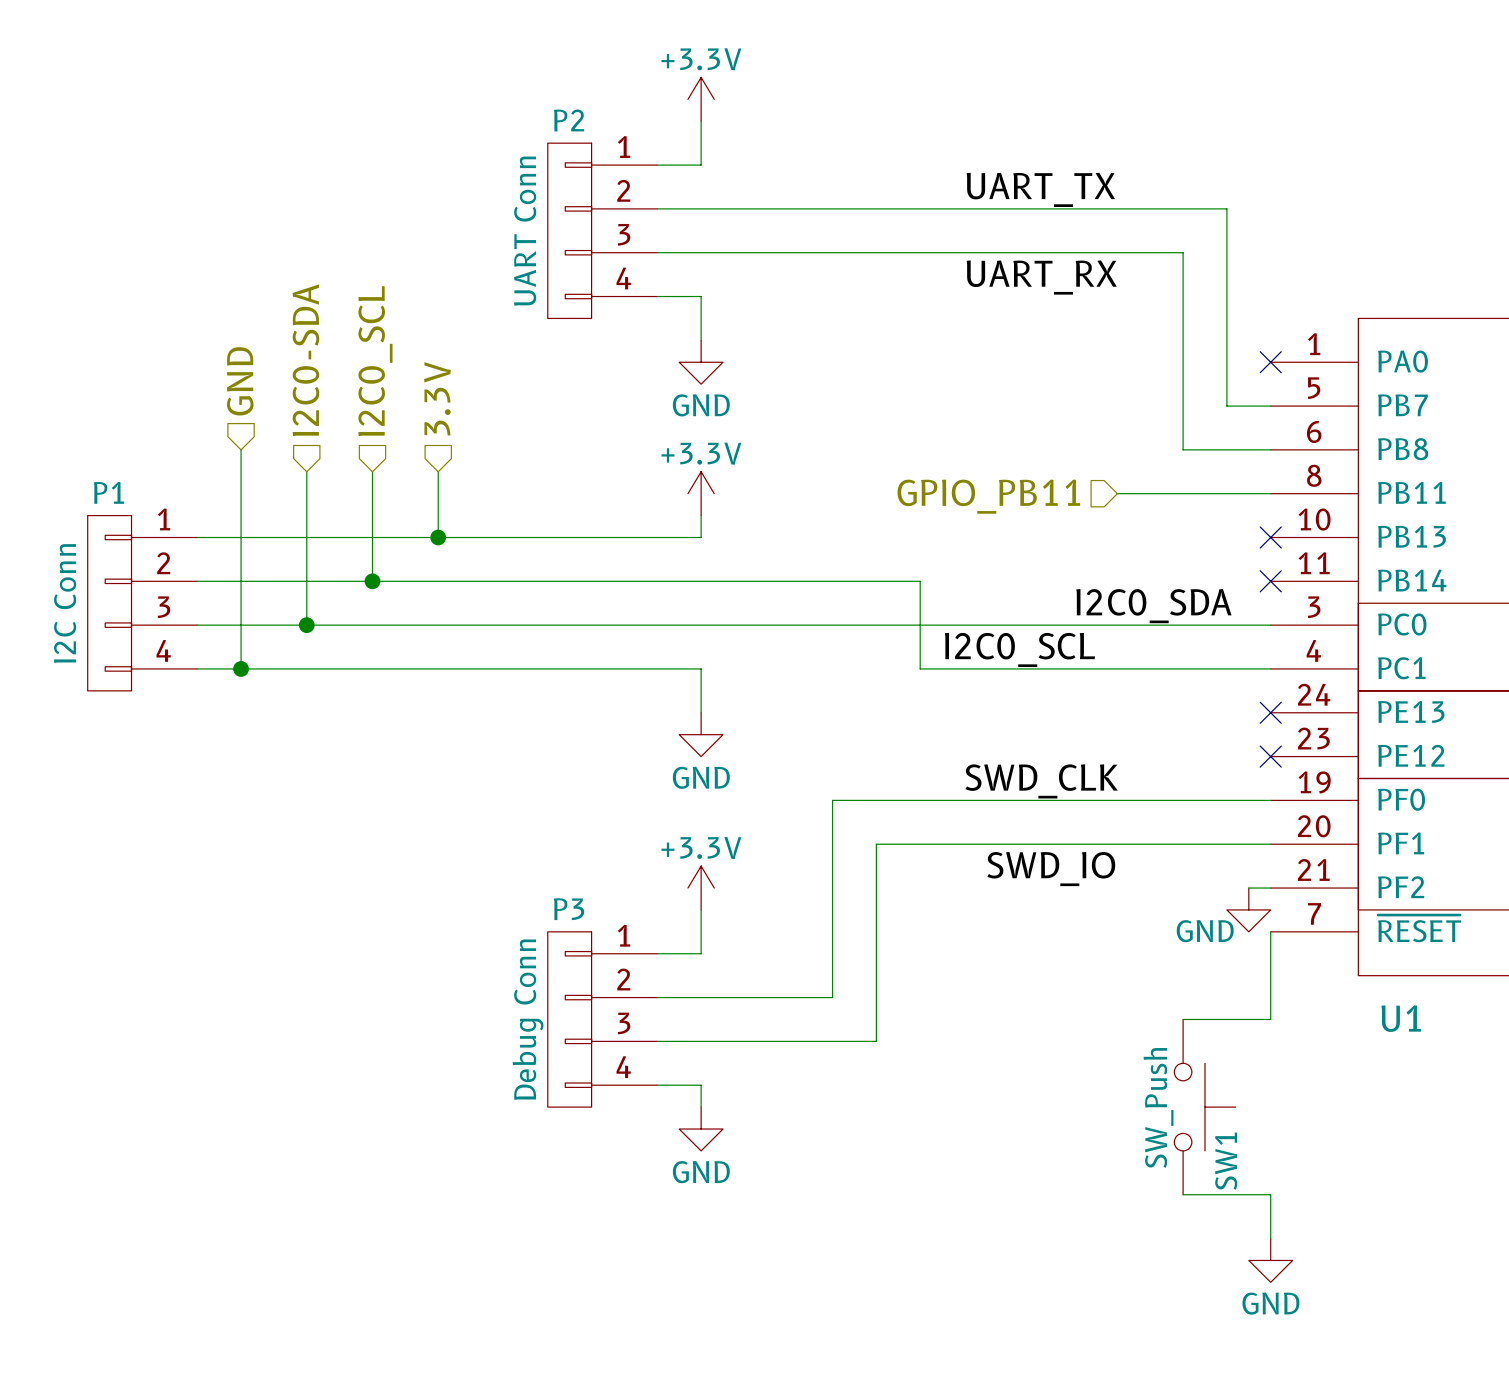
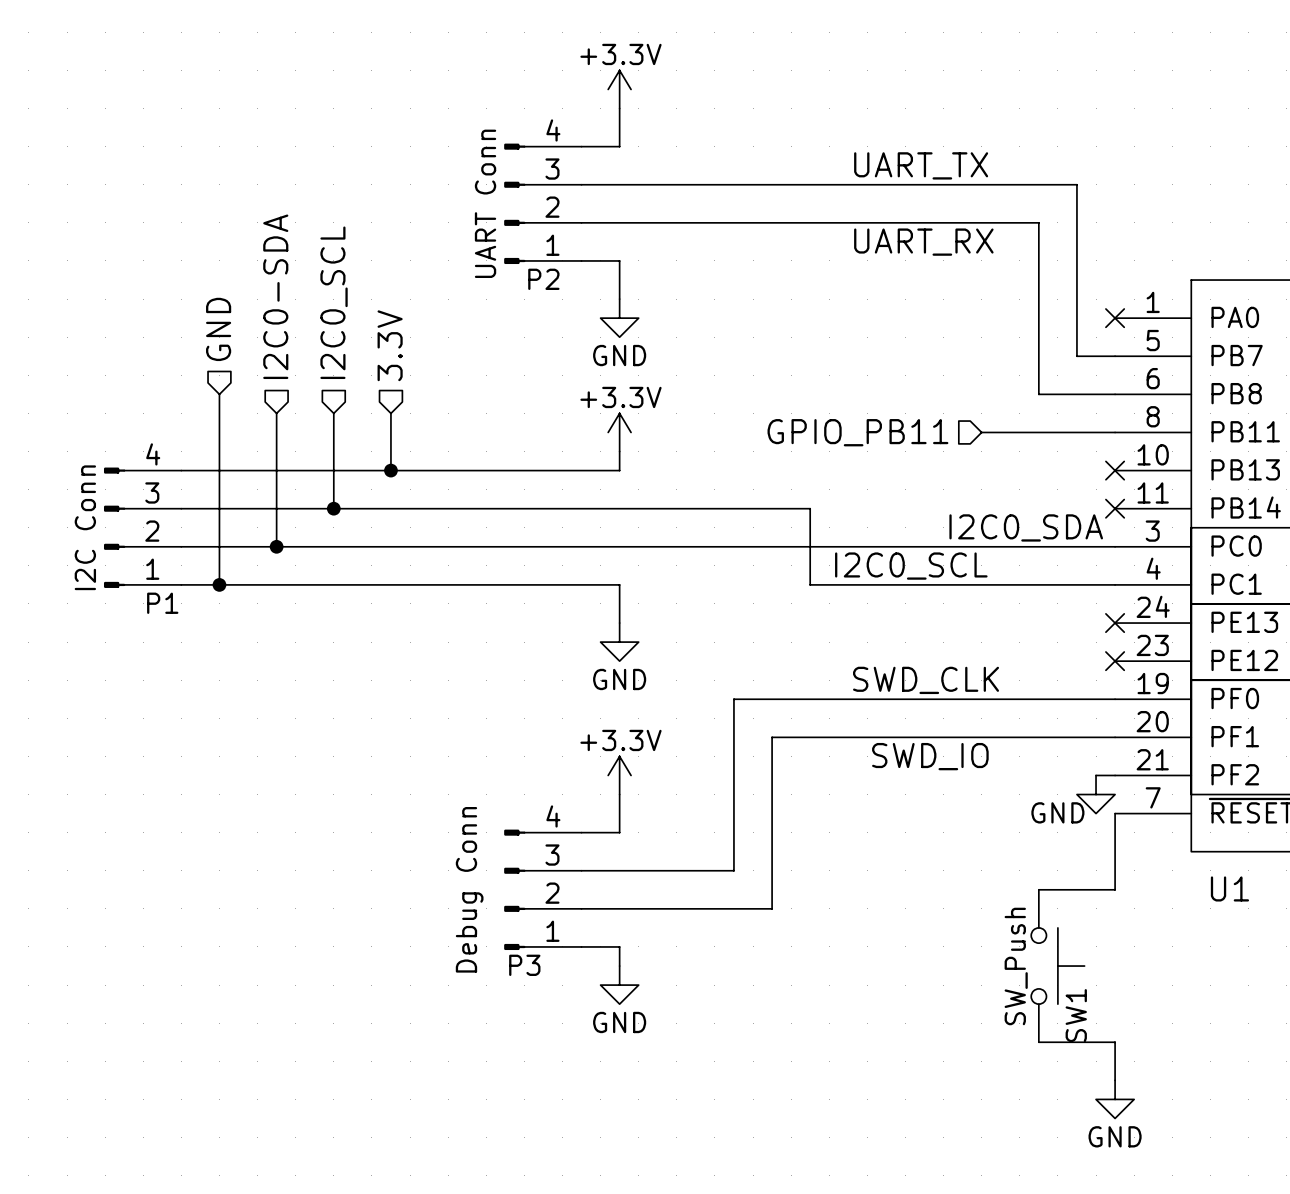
P2 name position: P2 (569, 120) -> P2 (543, 279)
P2 symbol: [547, 143, 658, 319] -> [504, 143, 582, 265]
P1 name position: P1 (108, 492) -> P1 (162, 603)
P1 symbol: [87, 515, 198, 691] -> [103, 467, 182, 588]
P3 name position: P3 (569, 909) -> P3 (524, 965)
P3 symbol: [547, 931, 658, 1108] -> [504, 829, 582, 951]

